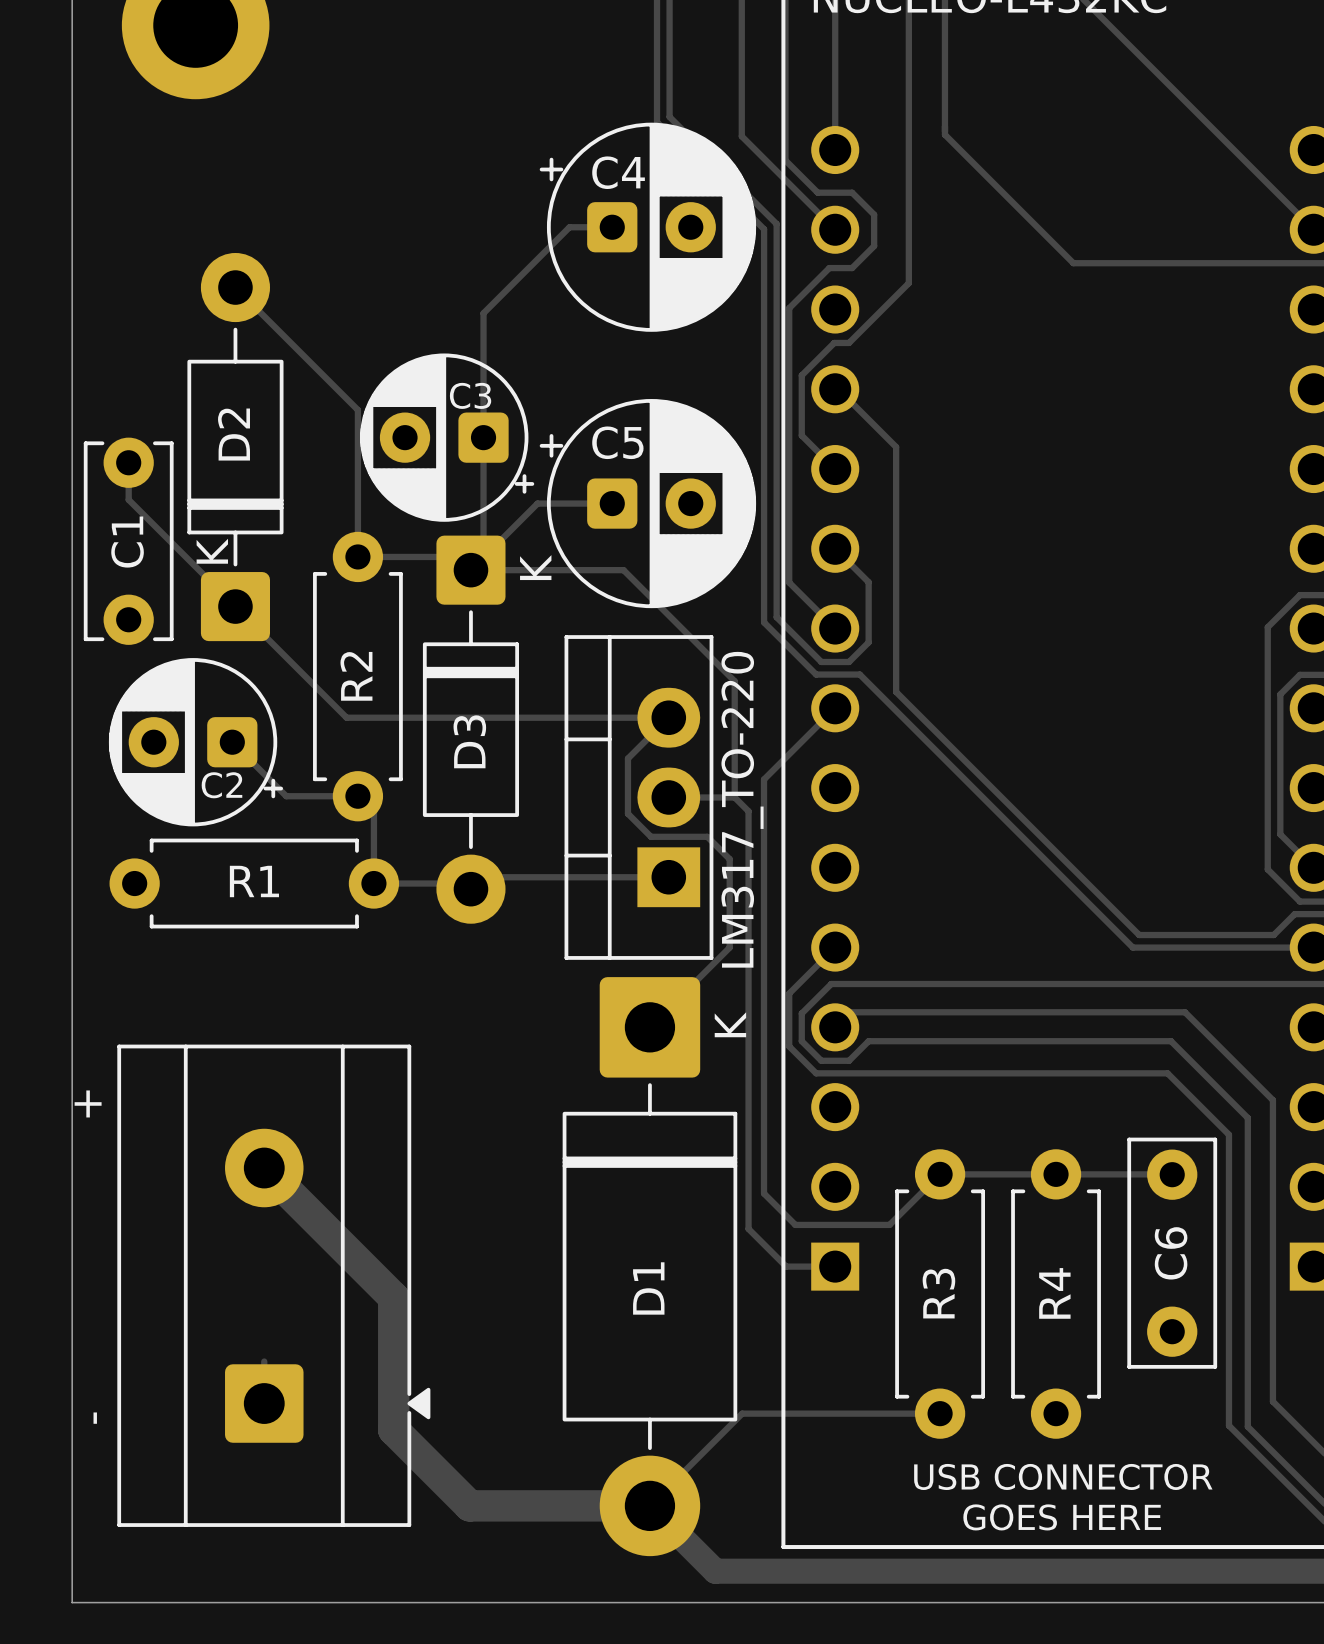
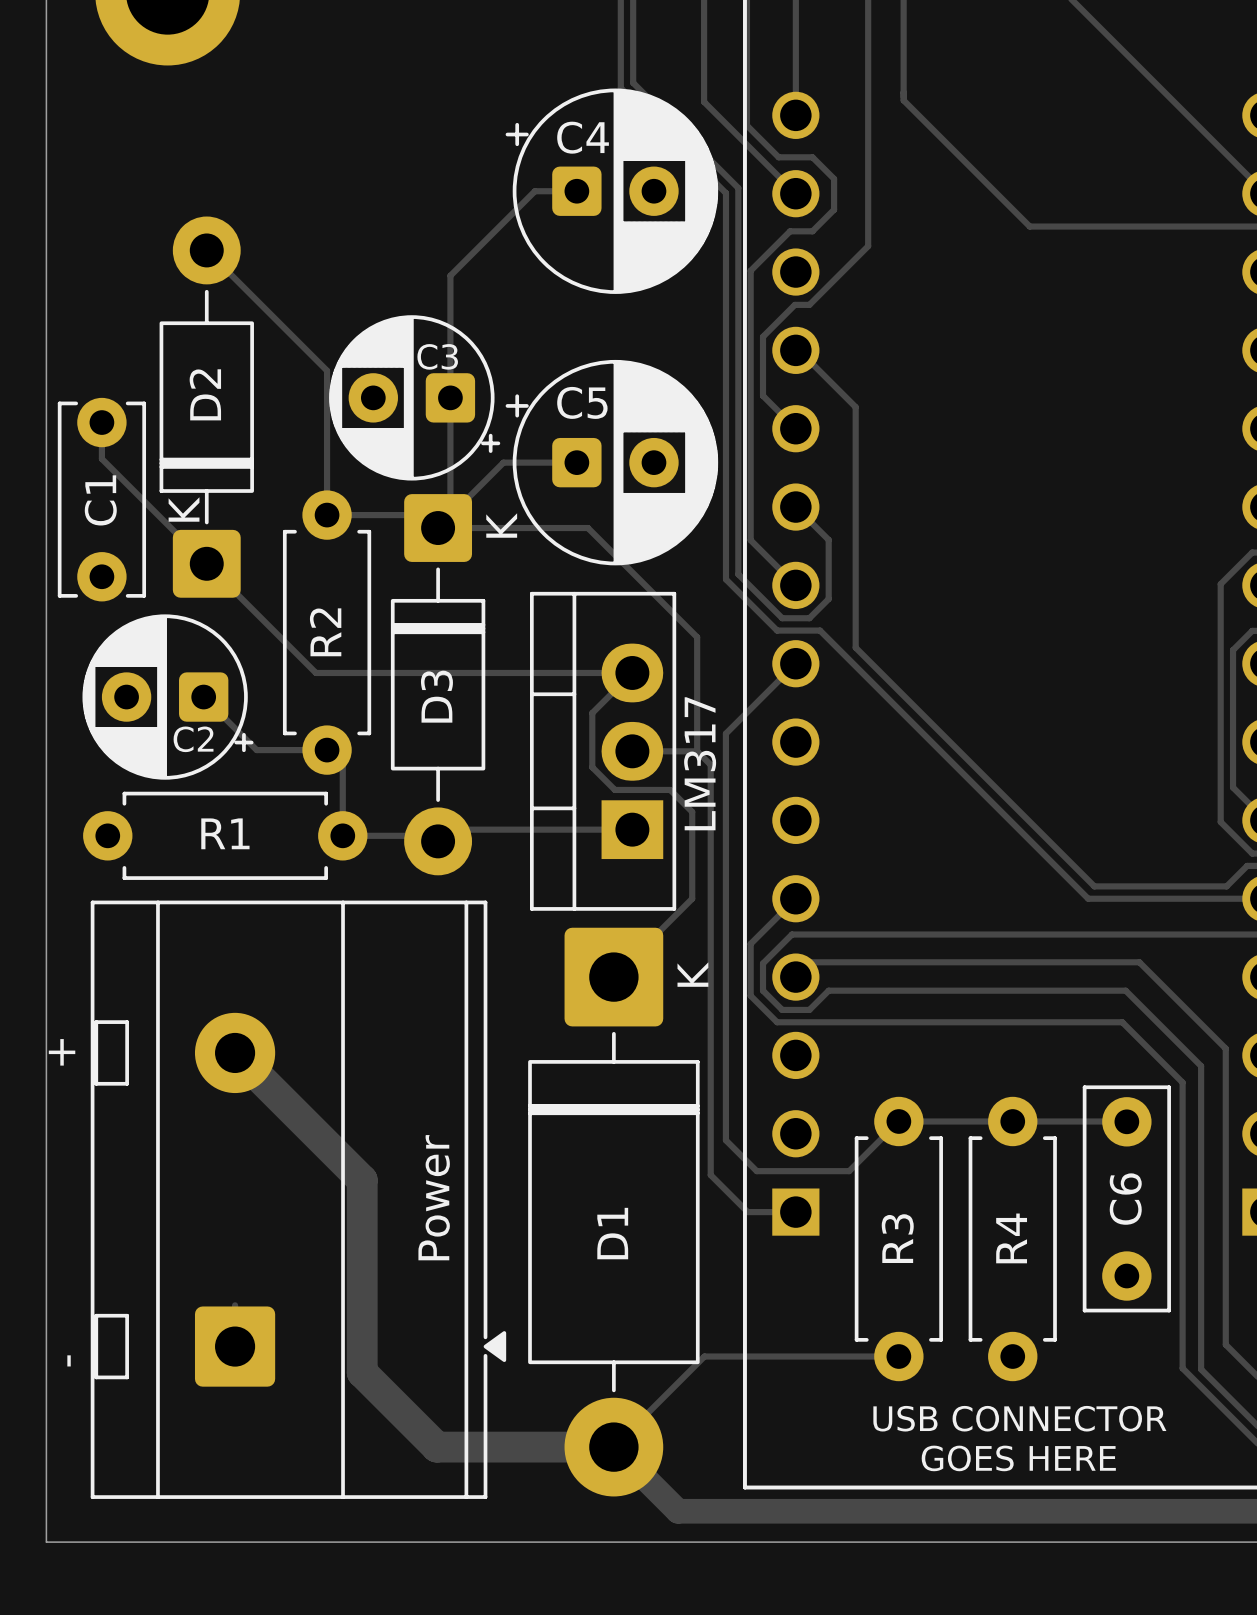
part value: LM317_TO-220 (742, 809) -> LM317 (700, 763)
track: (264, 1168) (393, 1297) -> (235, 1052) (362, 1180) (362, 1242)
part: none -> Power (298, 1199)
part: (273, 1285) -> none

